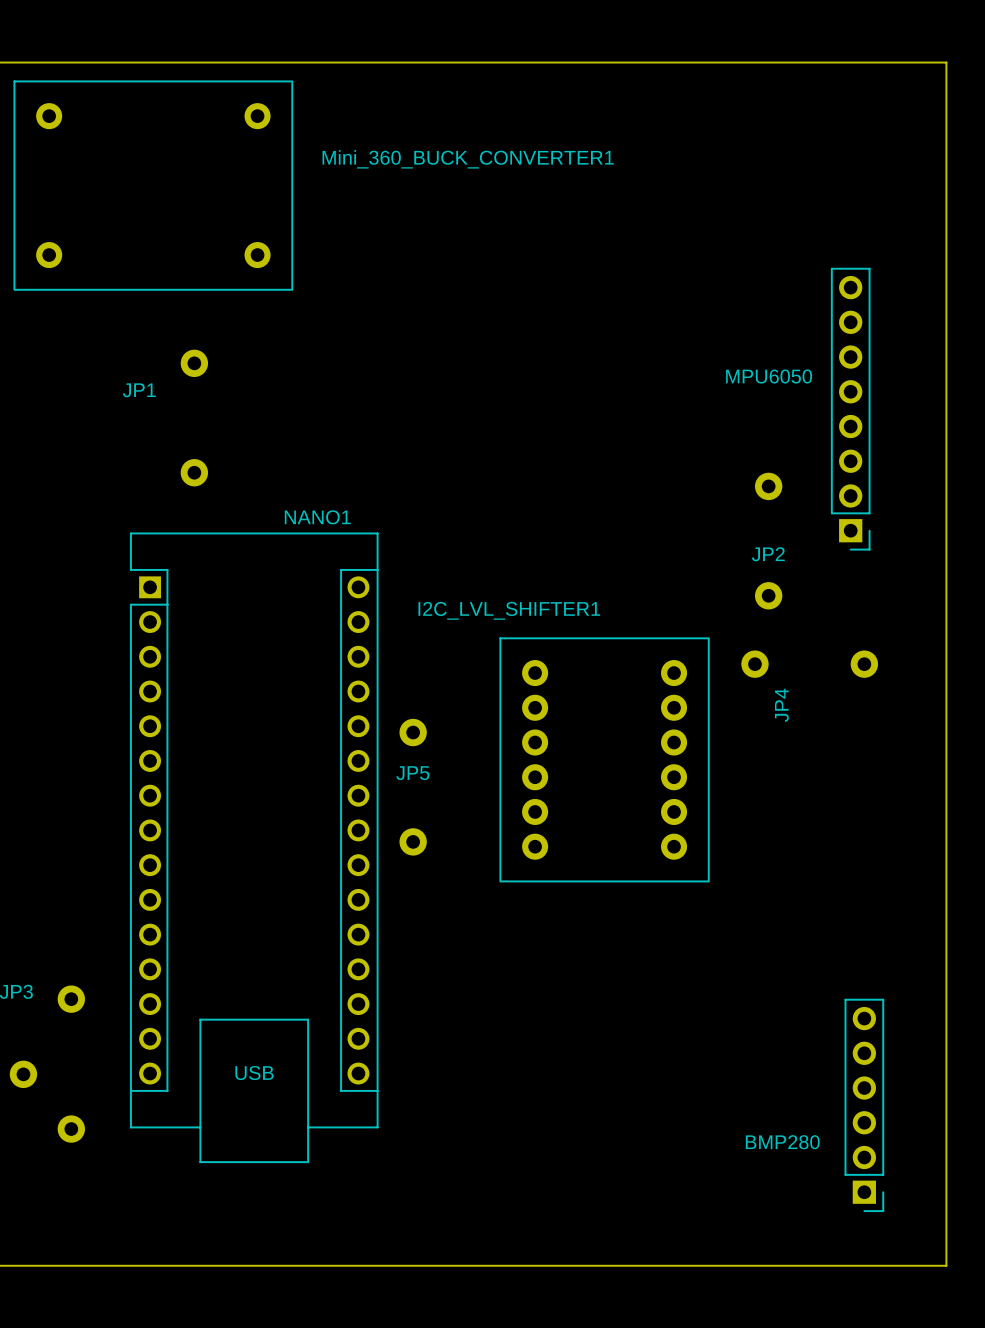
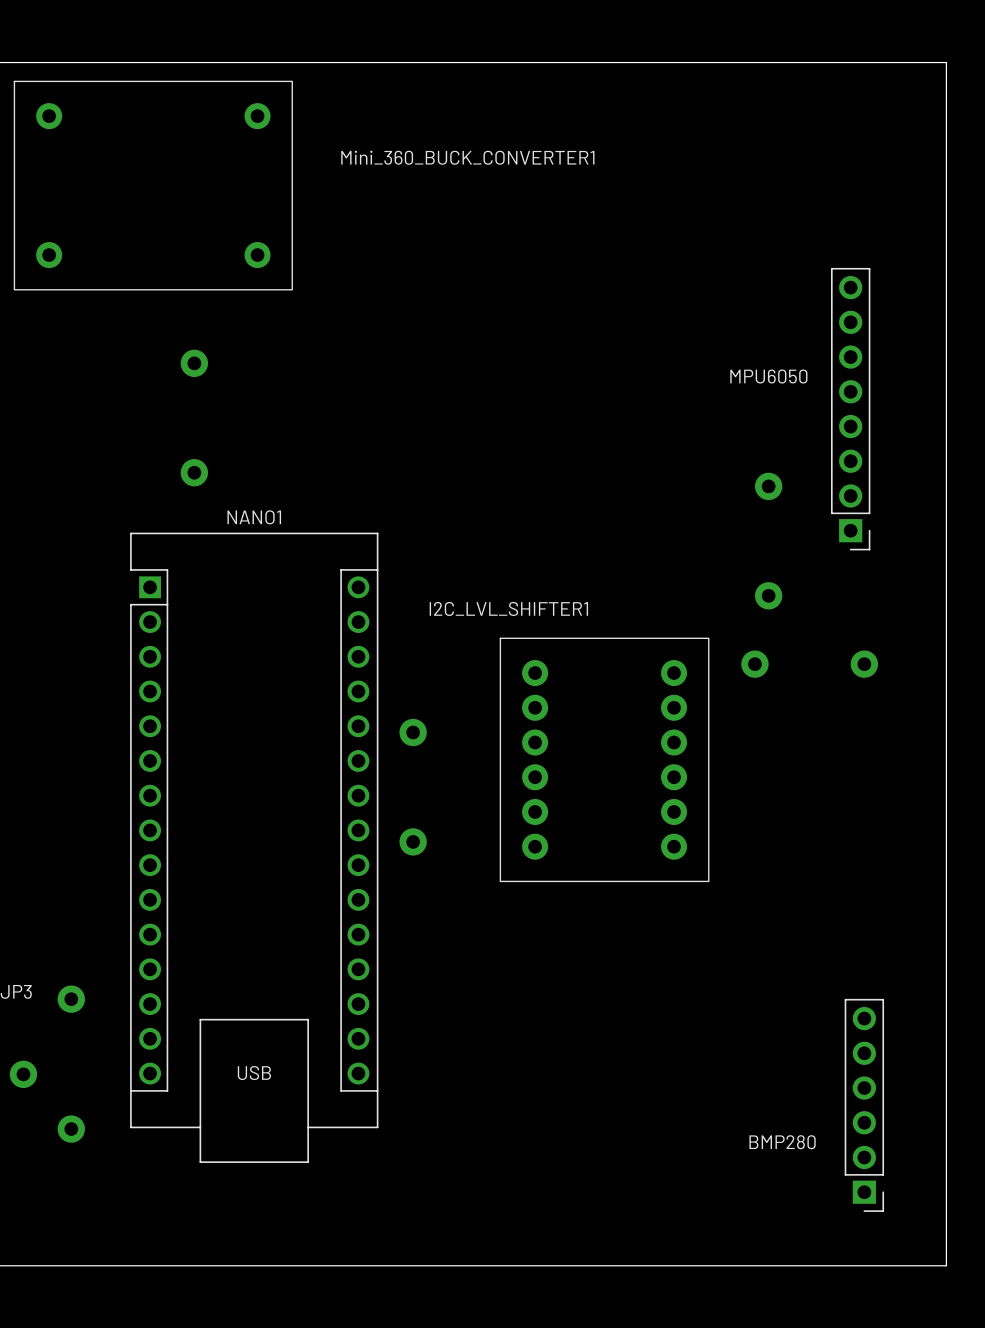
text: JP1 (139, 390) -> none
NANO1 name position: NANO1 (317, 517) -> NANO1 (254, 517)
text: JP2 (768, 554) -> none
text: JP4 (781, 705) -> none
text: JP5 (412, 773) -> none

